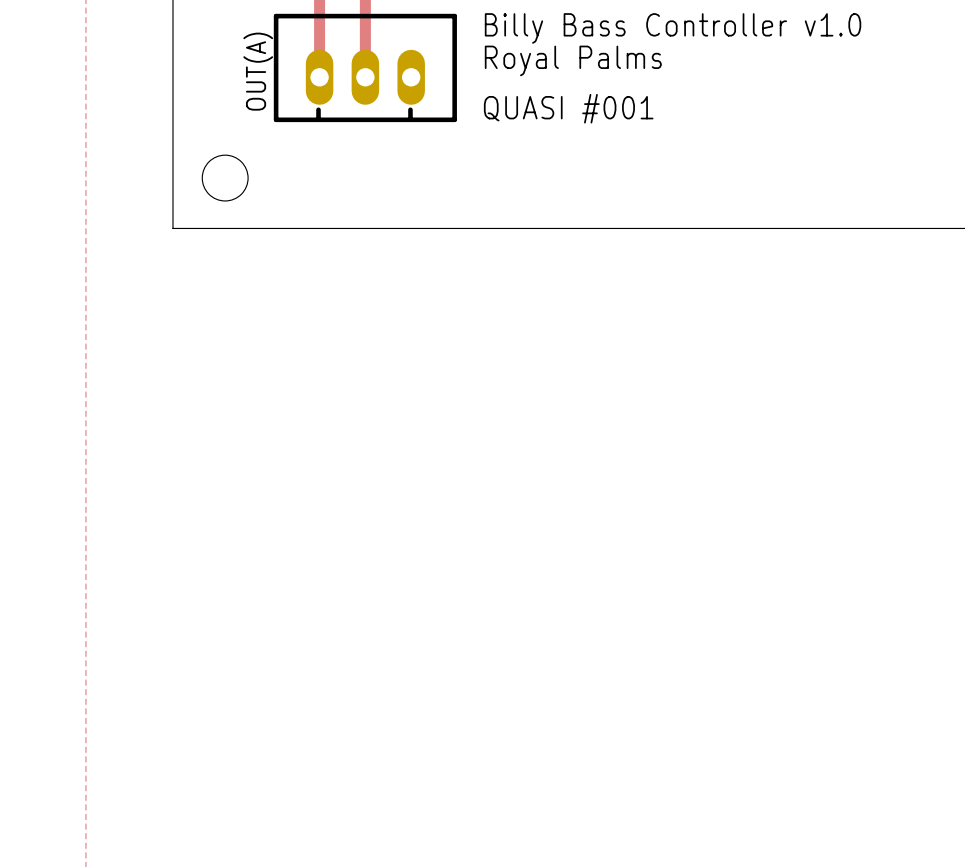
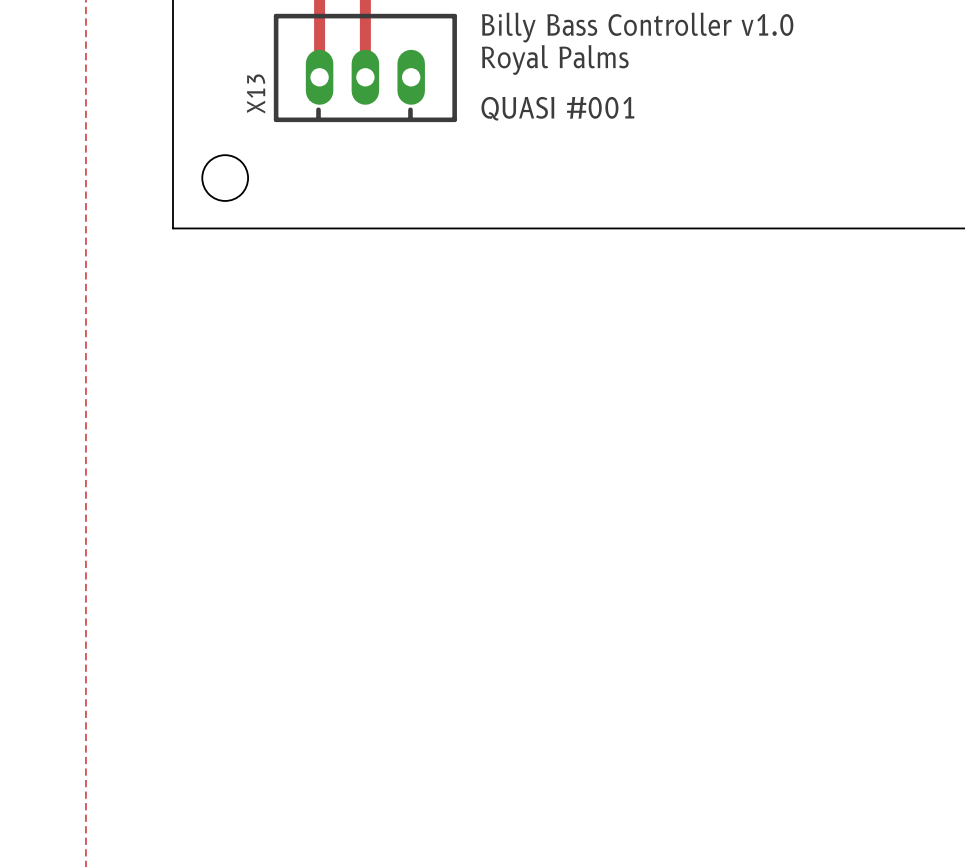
OUT(A) name: OUT(A) (258, 71) -> X13 (256, 93)

